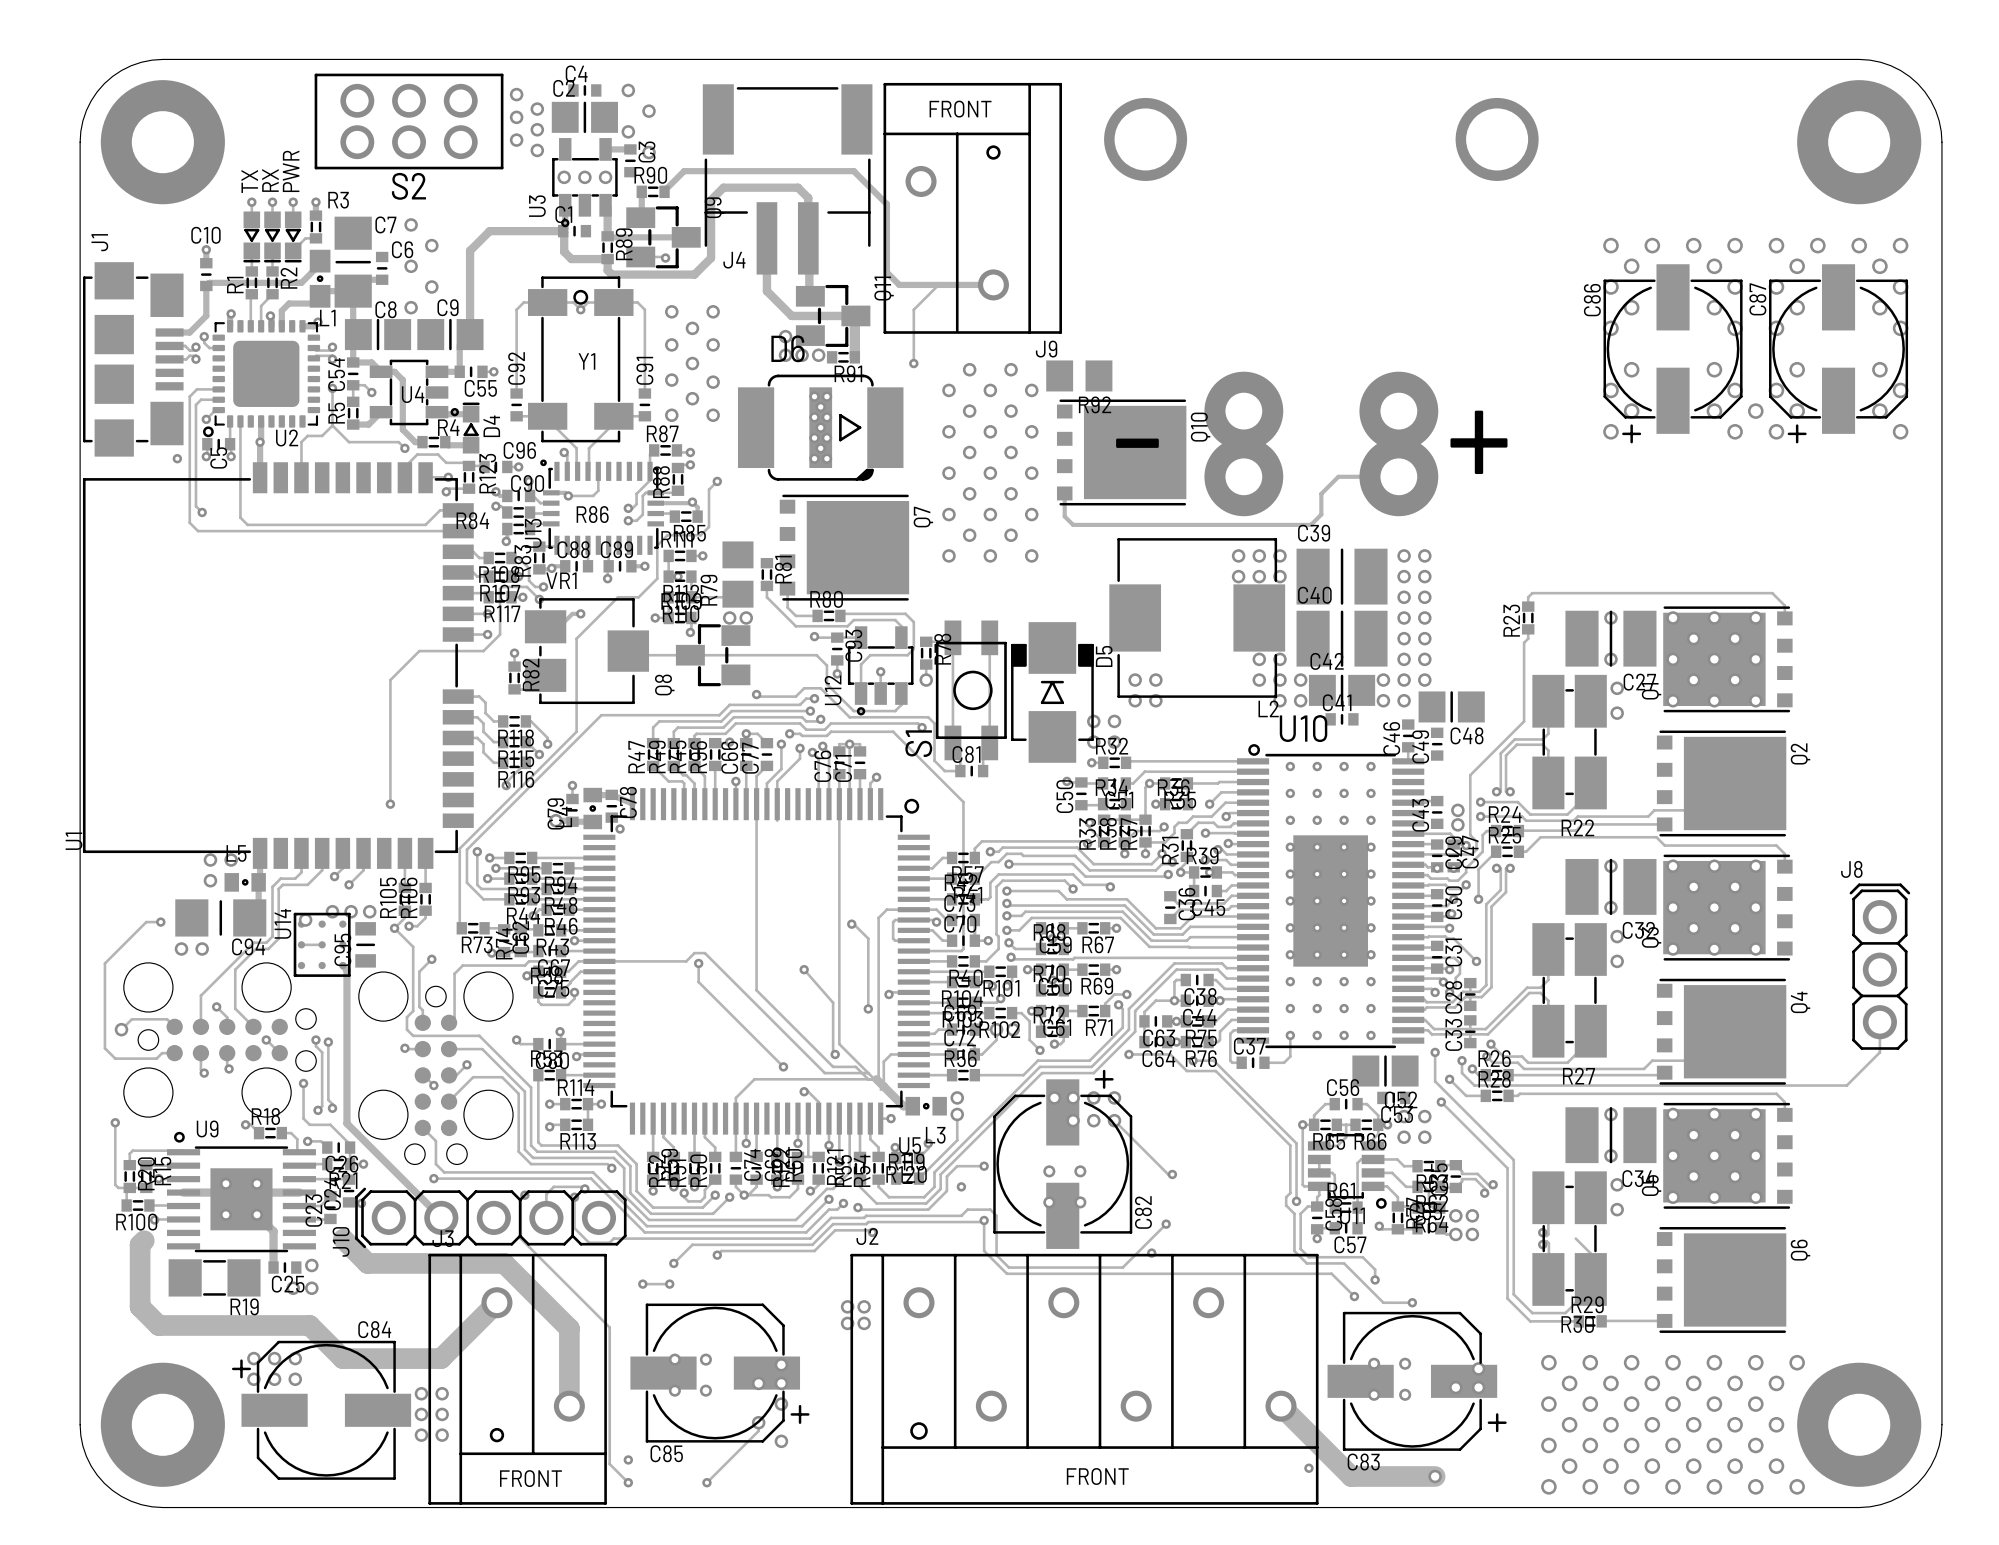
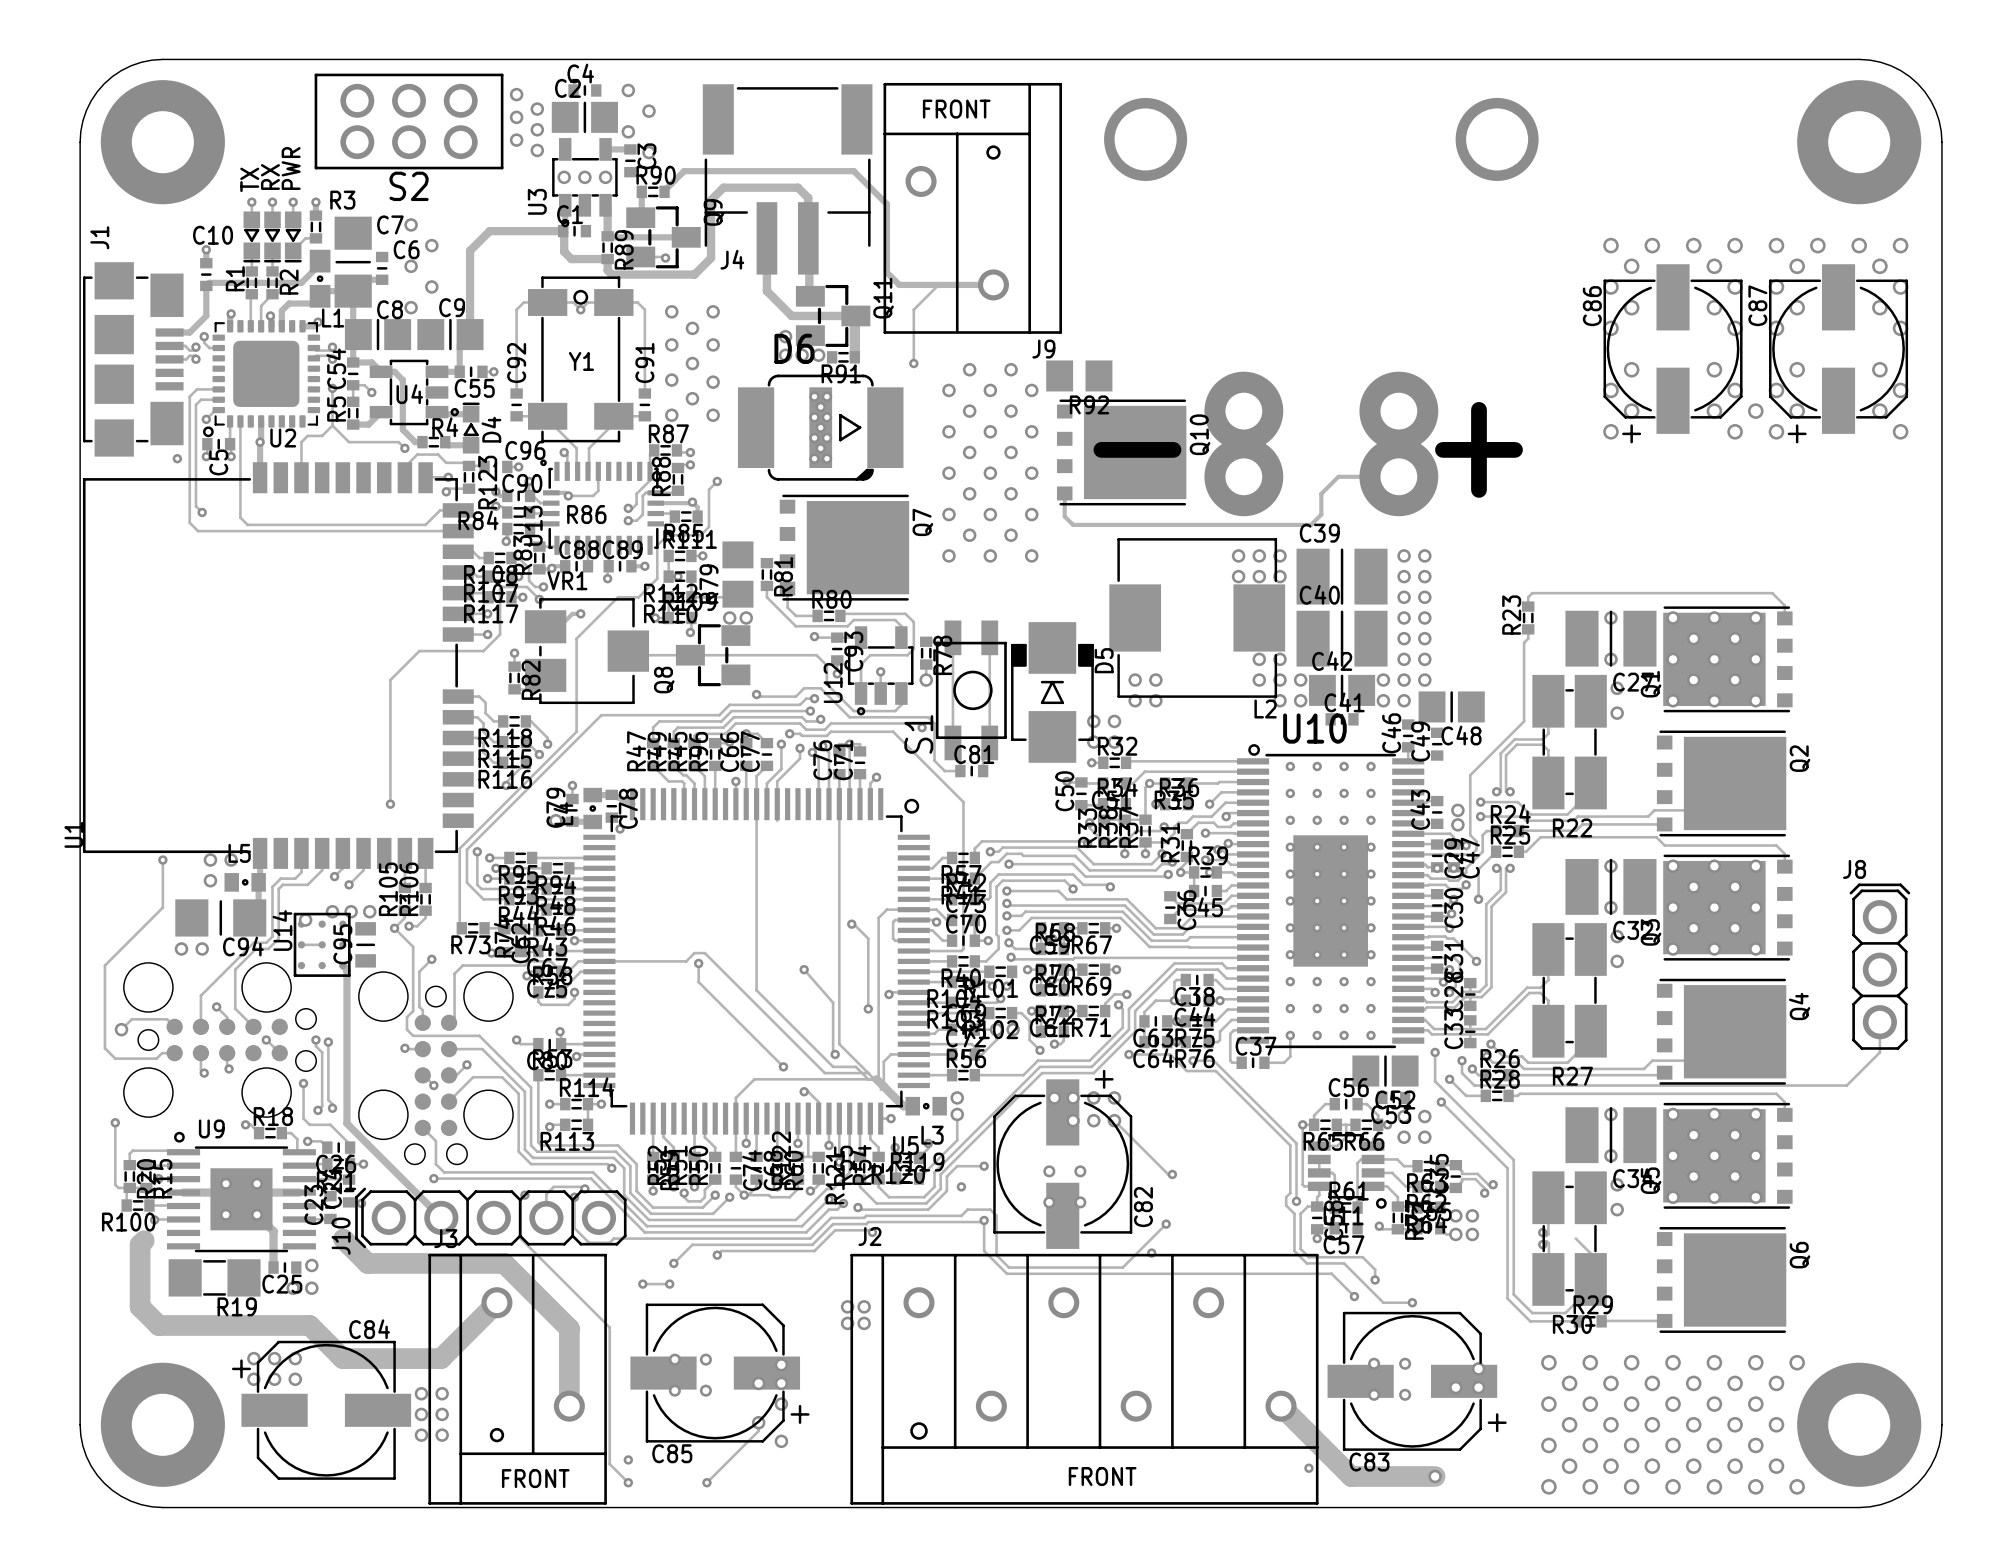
track: (160, 922) (146, 922) (104, 965) -> (162, 860) (162, 907) (104, 965)
via position: (160, 922) -> (162, 860)

